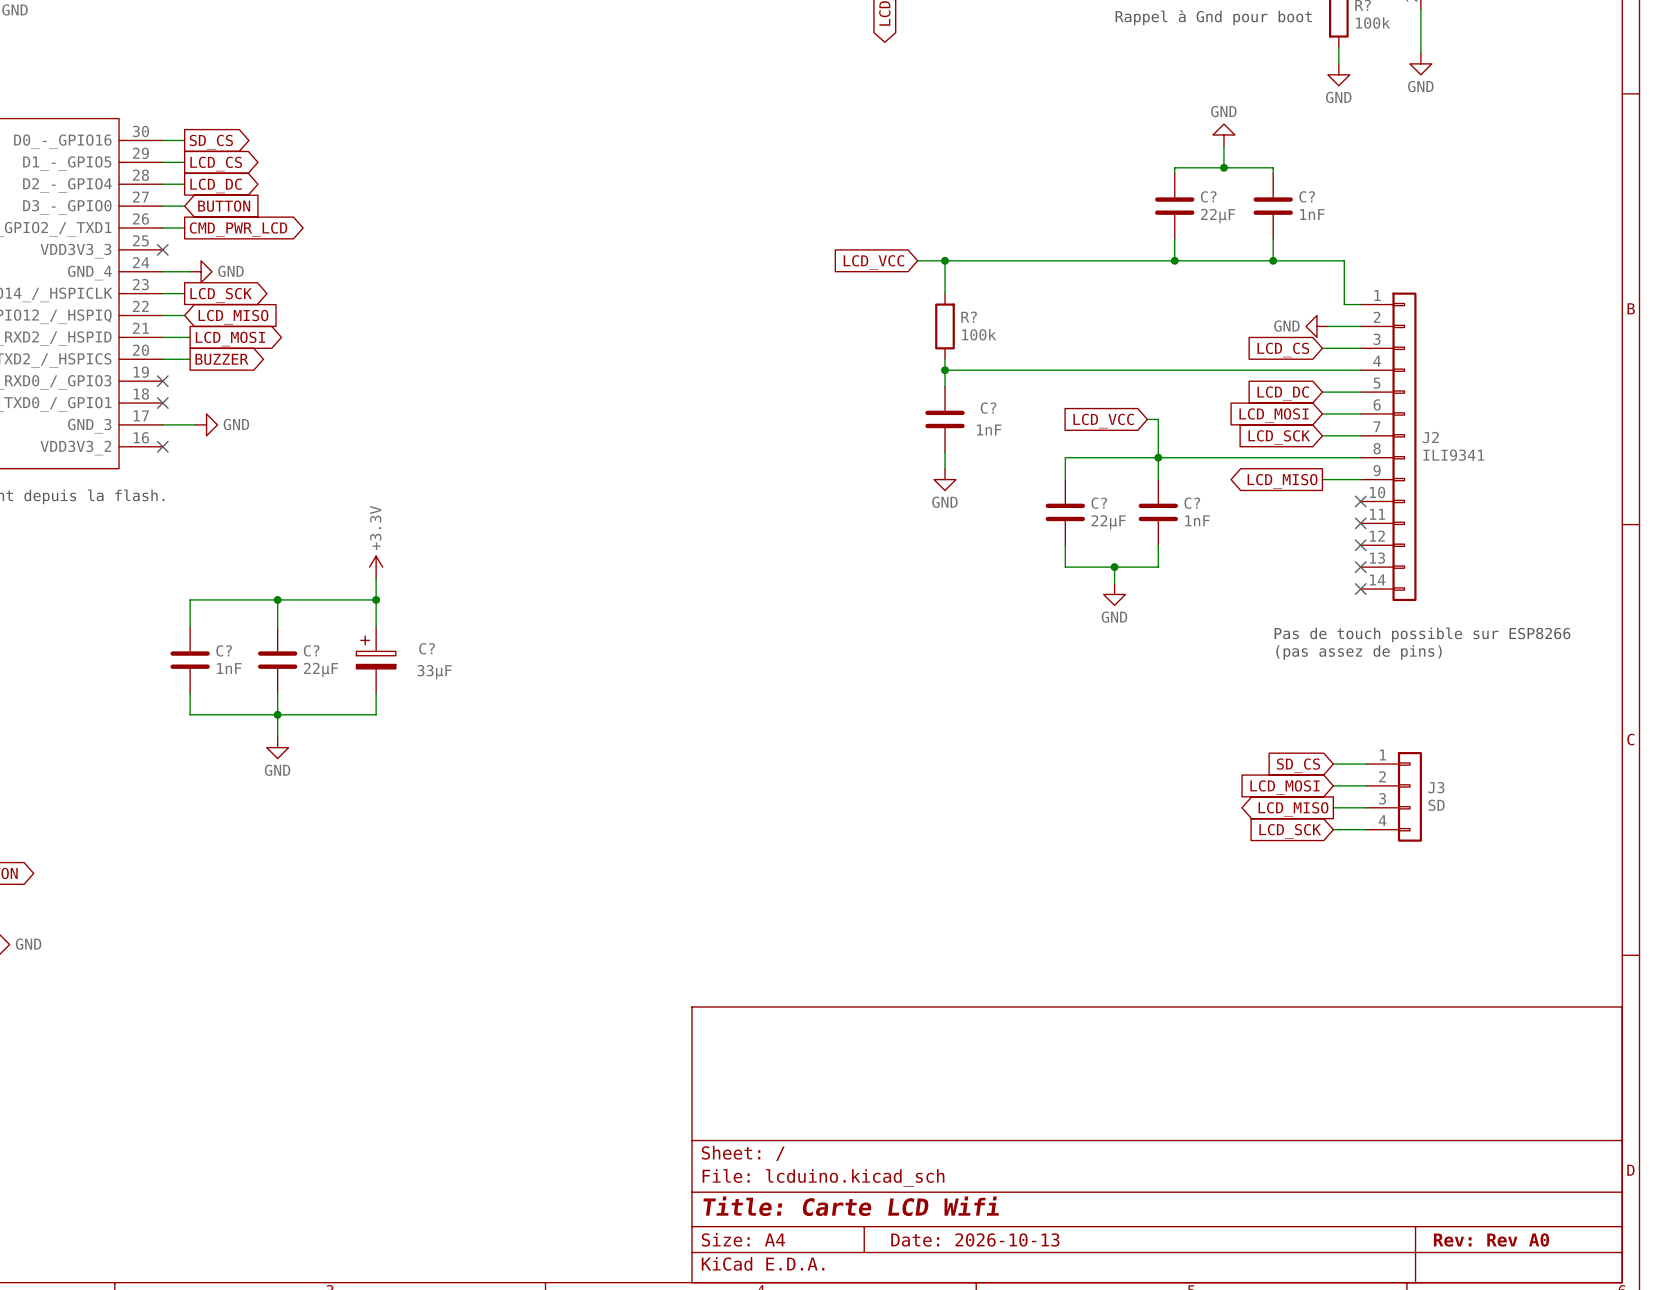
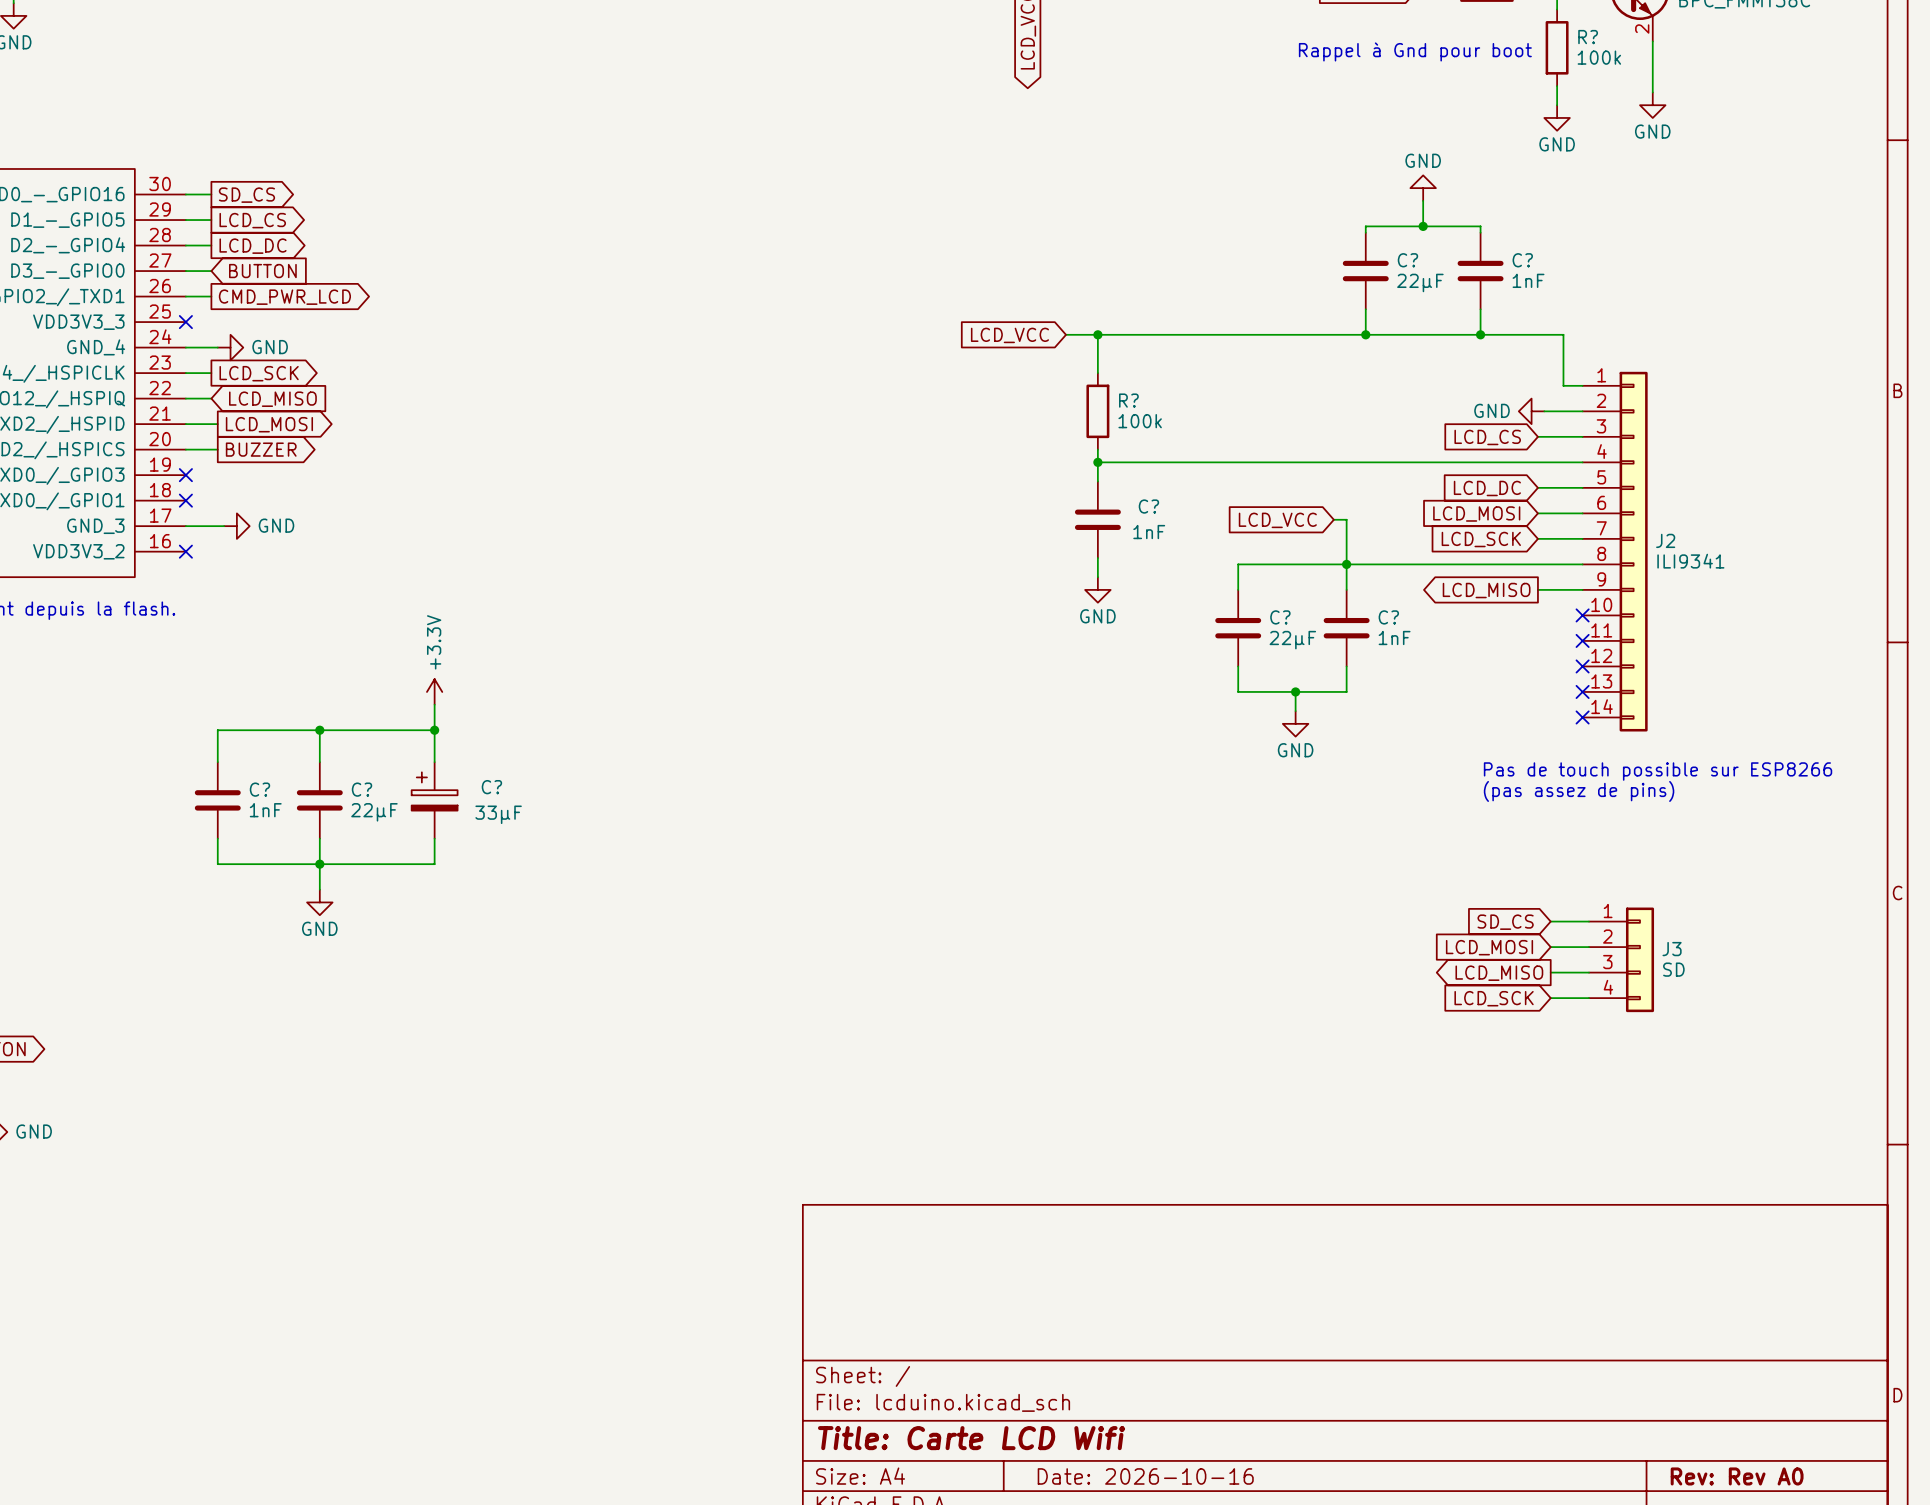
title block: Date: 2026-10-13 (975, 1239) -> Date: 2026-10-16 (1145, 1476)

